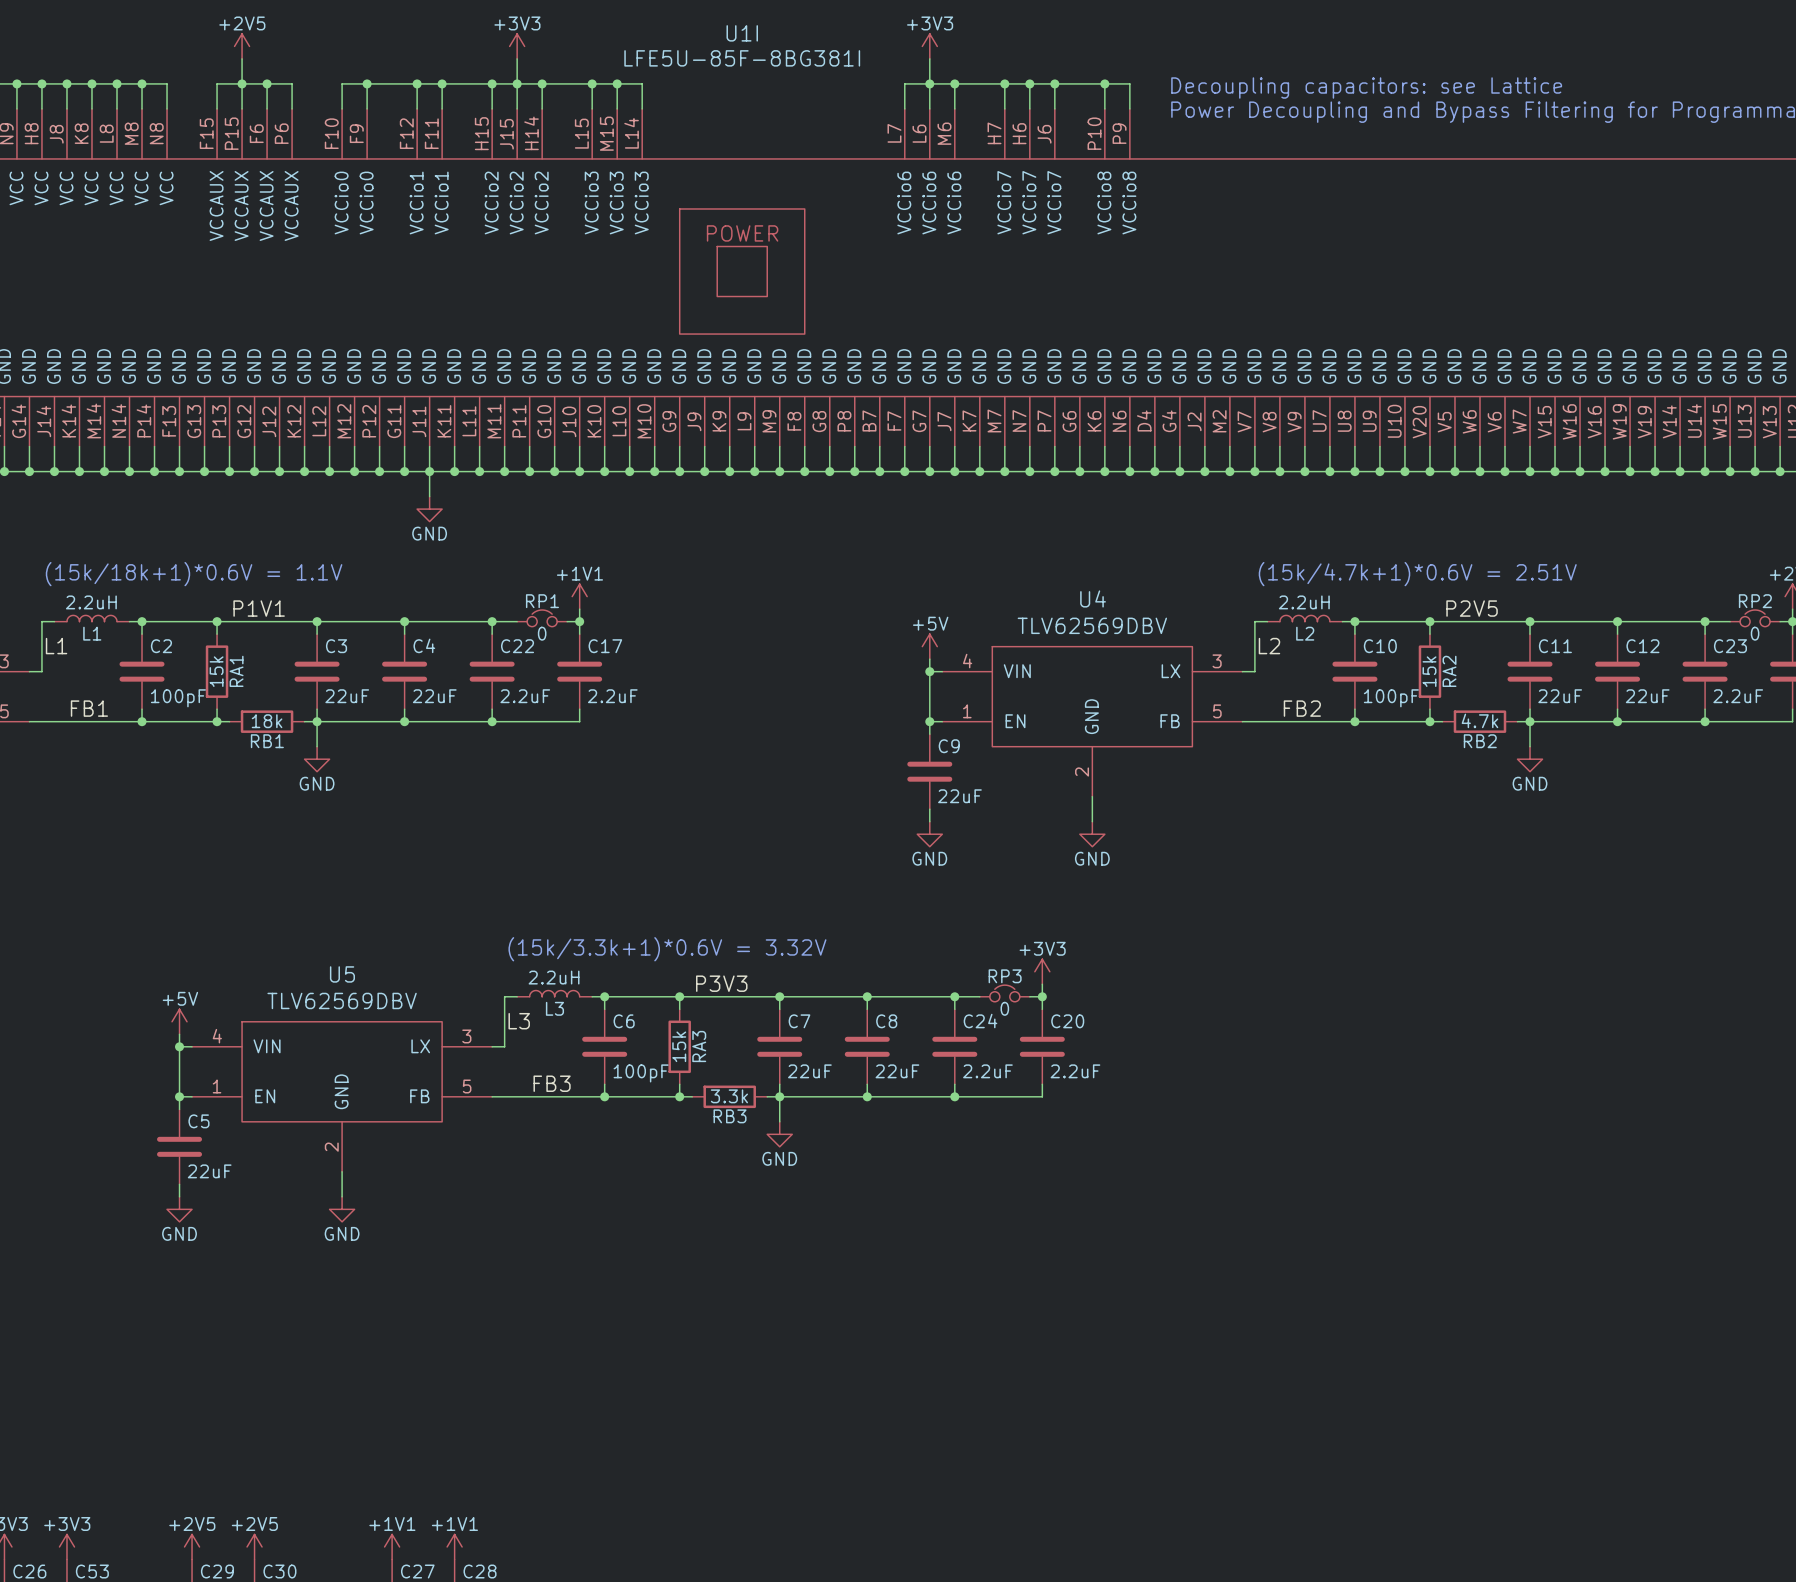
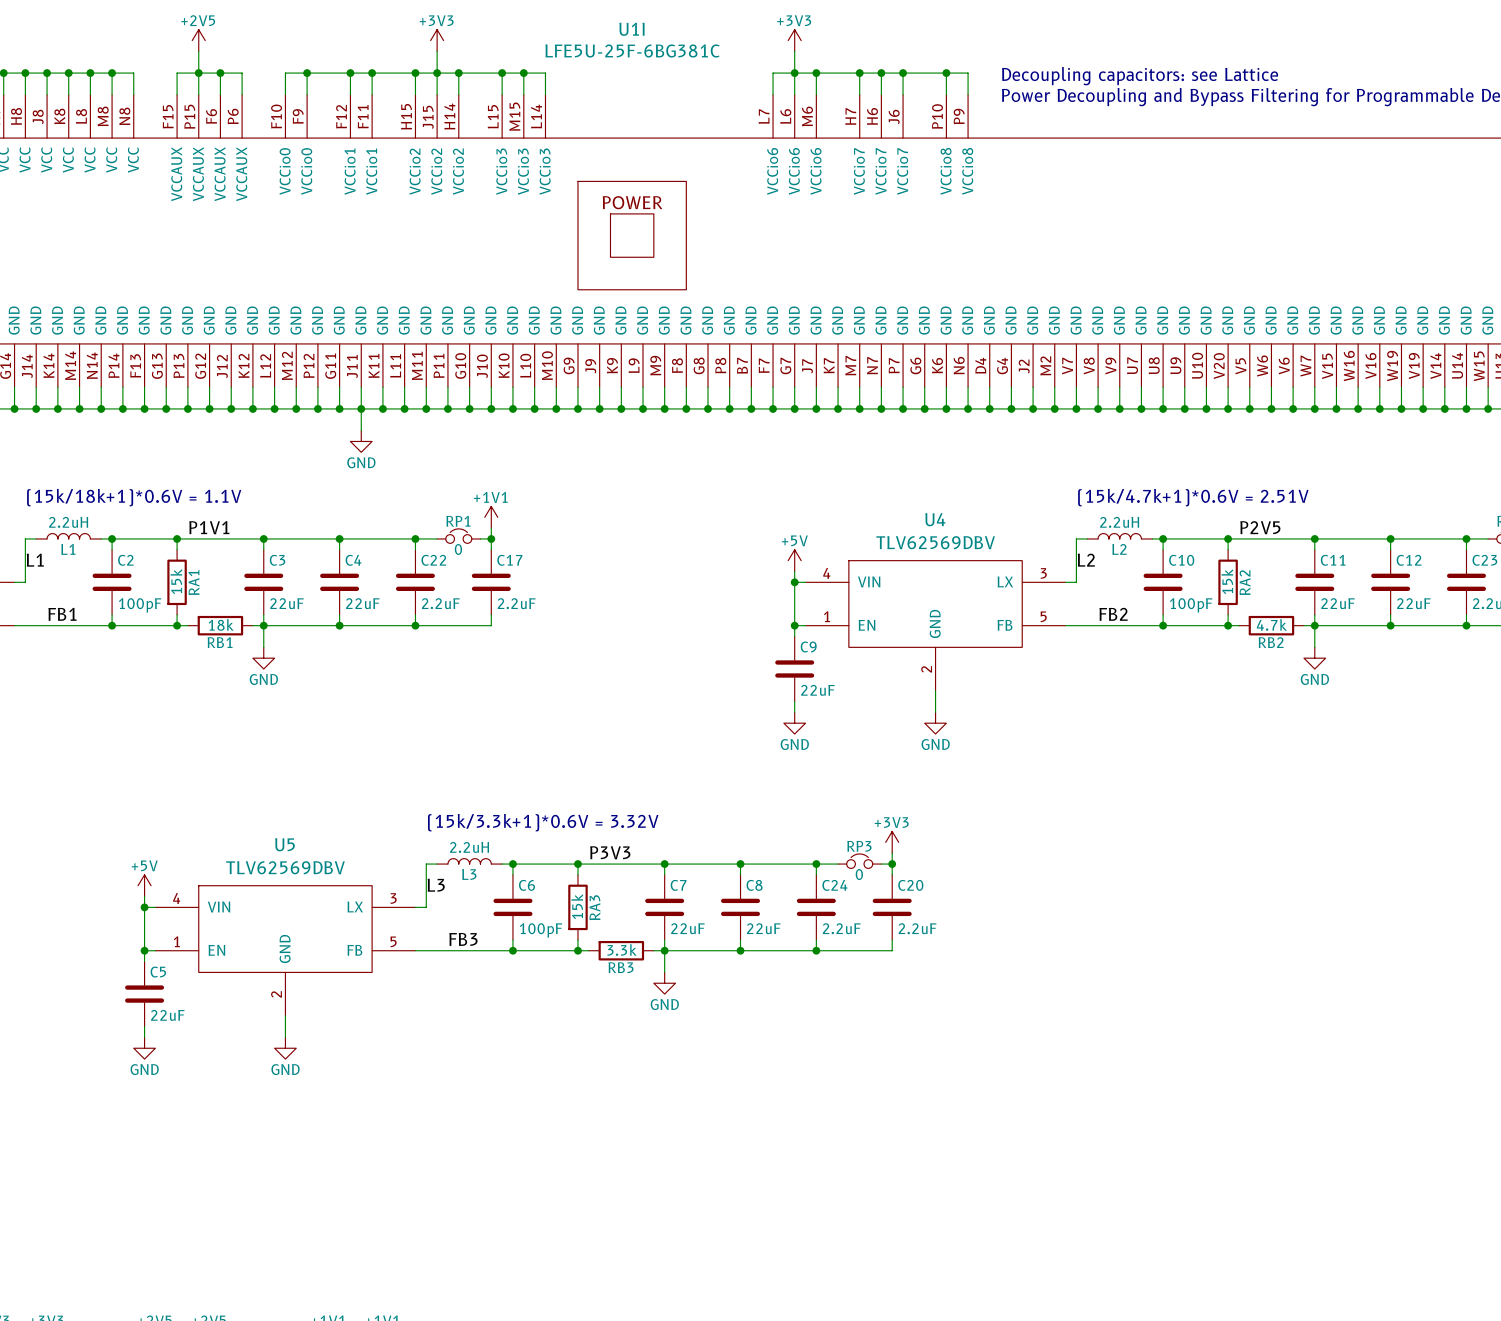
U1I value: LFE5U-85F-8BG381I (742, 58) -> LFE5U-25F-6BG381C (632, 50)

